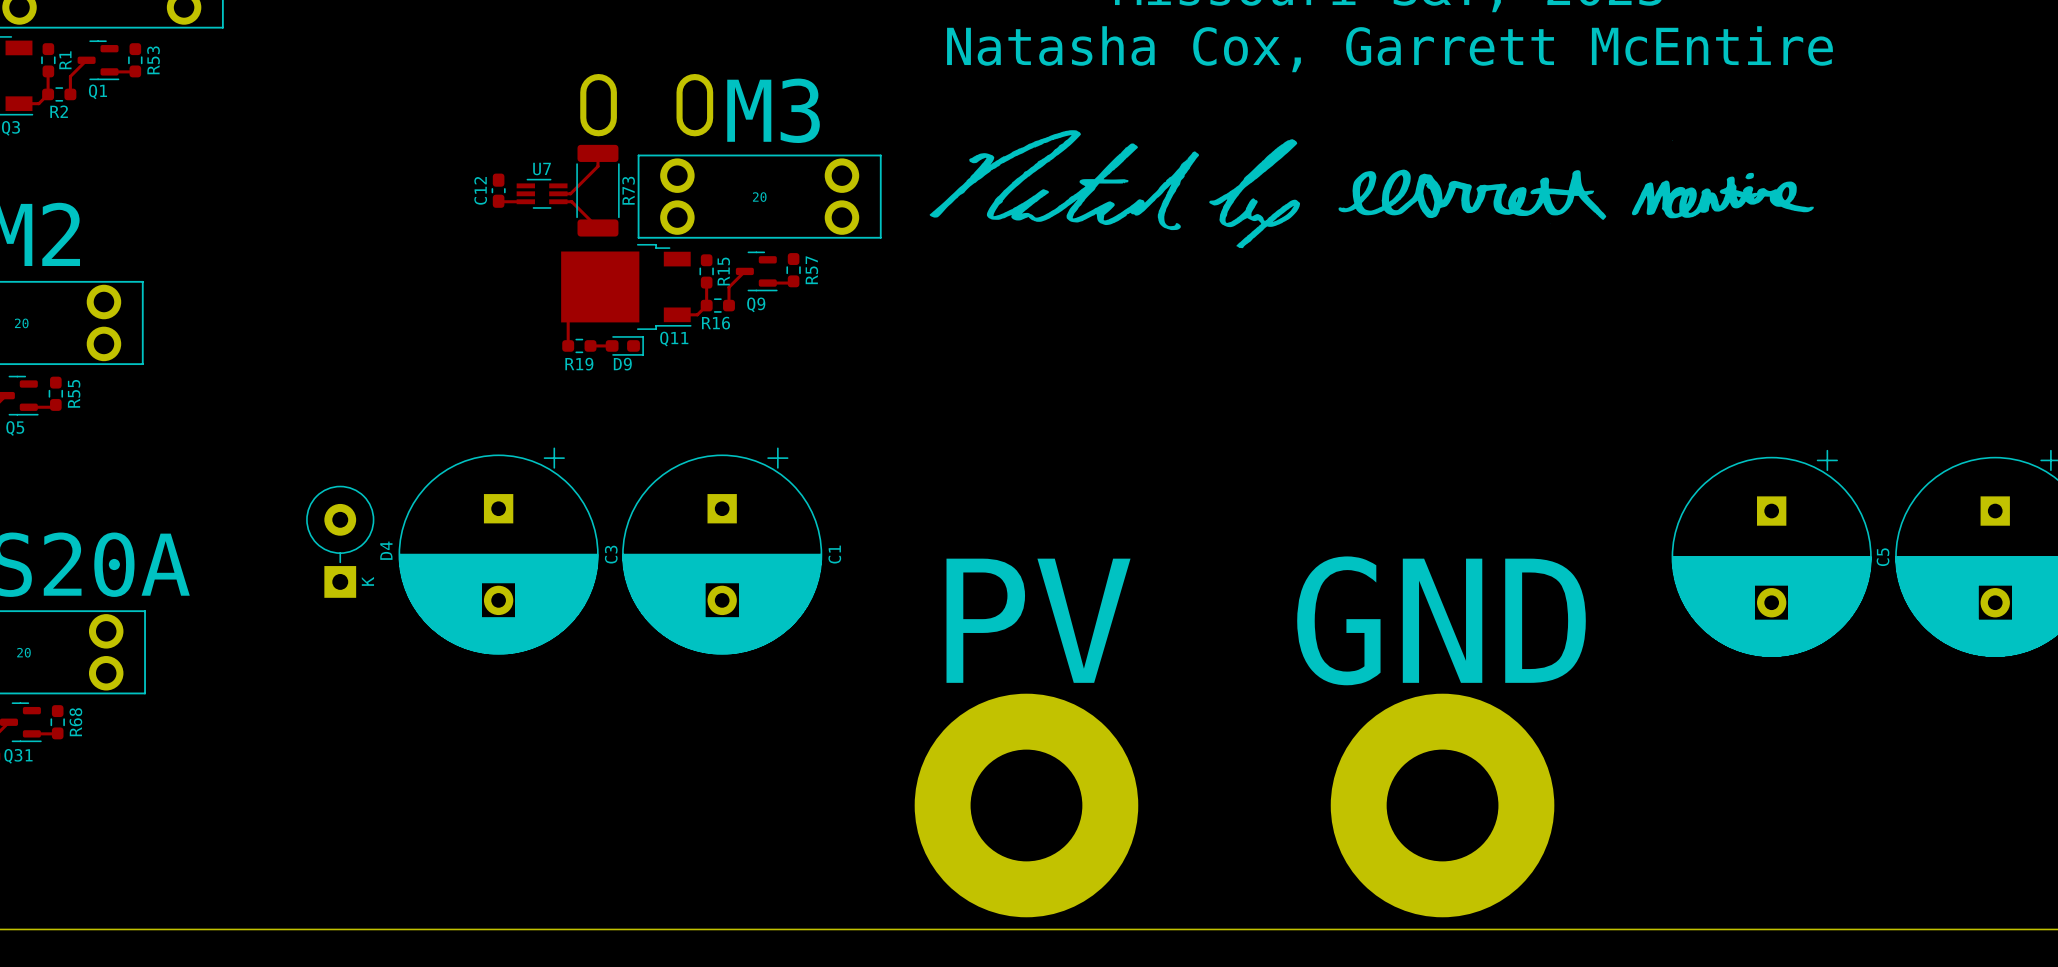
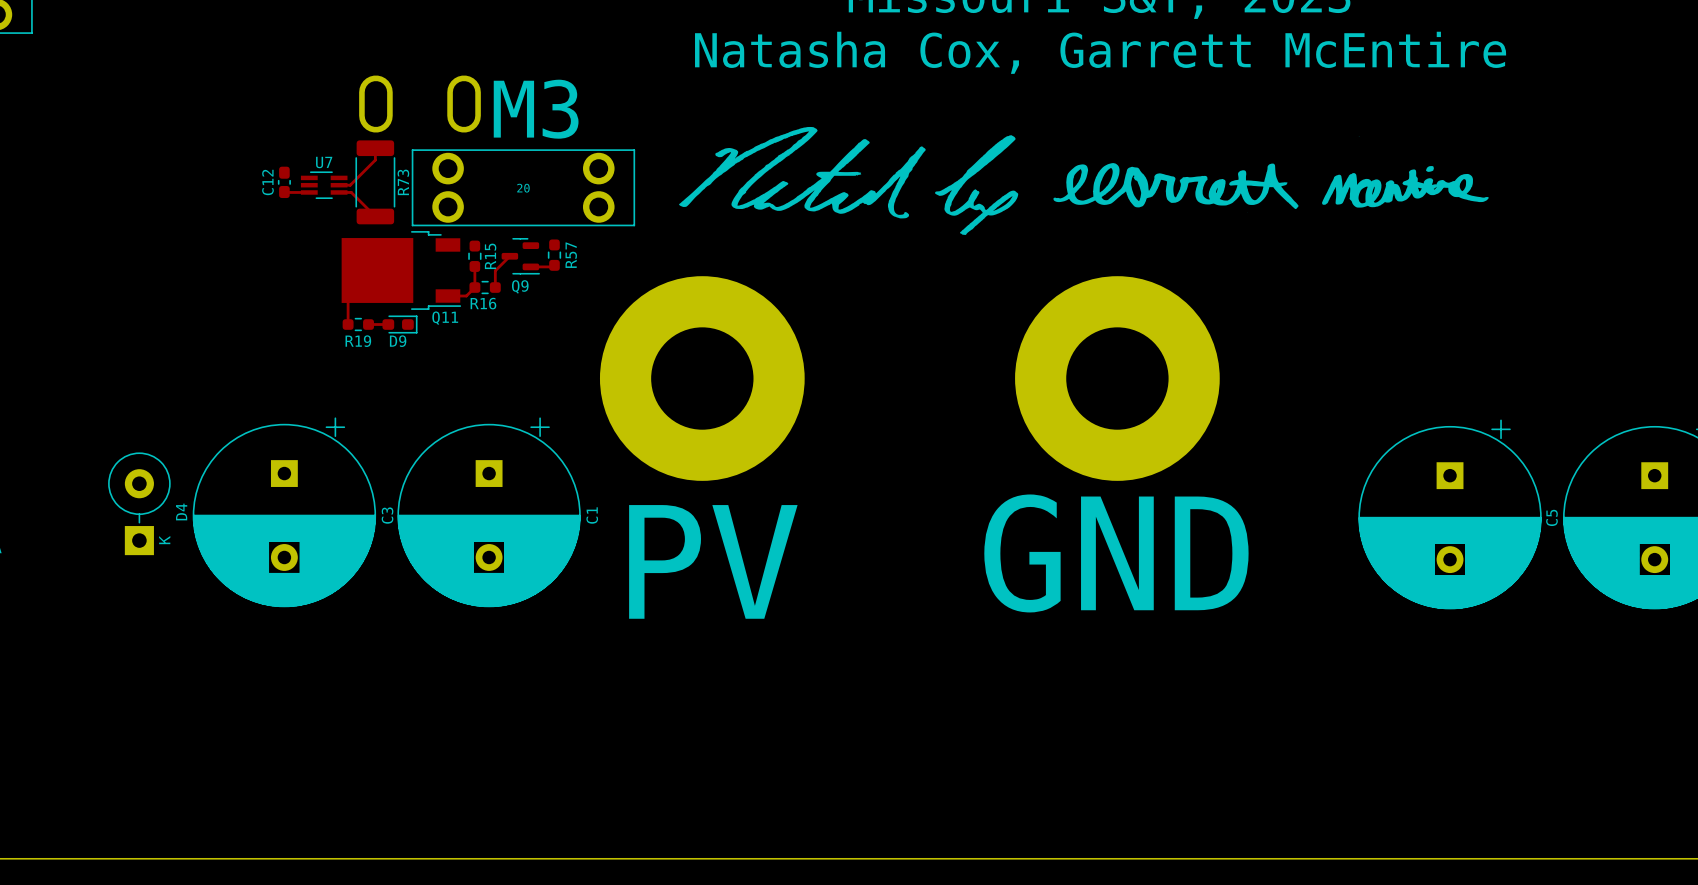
part: none -> (702, 378)
part: none -> (1117, 378)
text position: PV (1038, 620) -> PV (713, 561)
text position: GND (1441, 620) -> GND (1116, 553)
part: (1026, 805) -> none
part: (1442, 805) -> none

